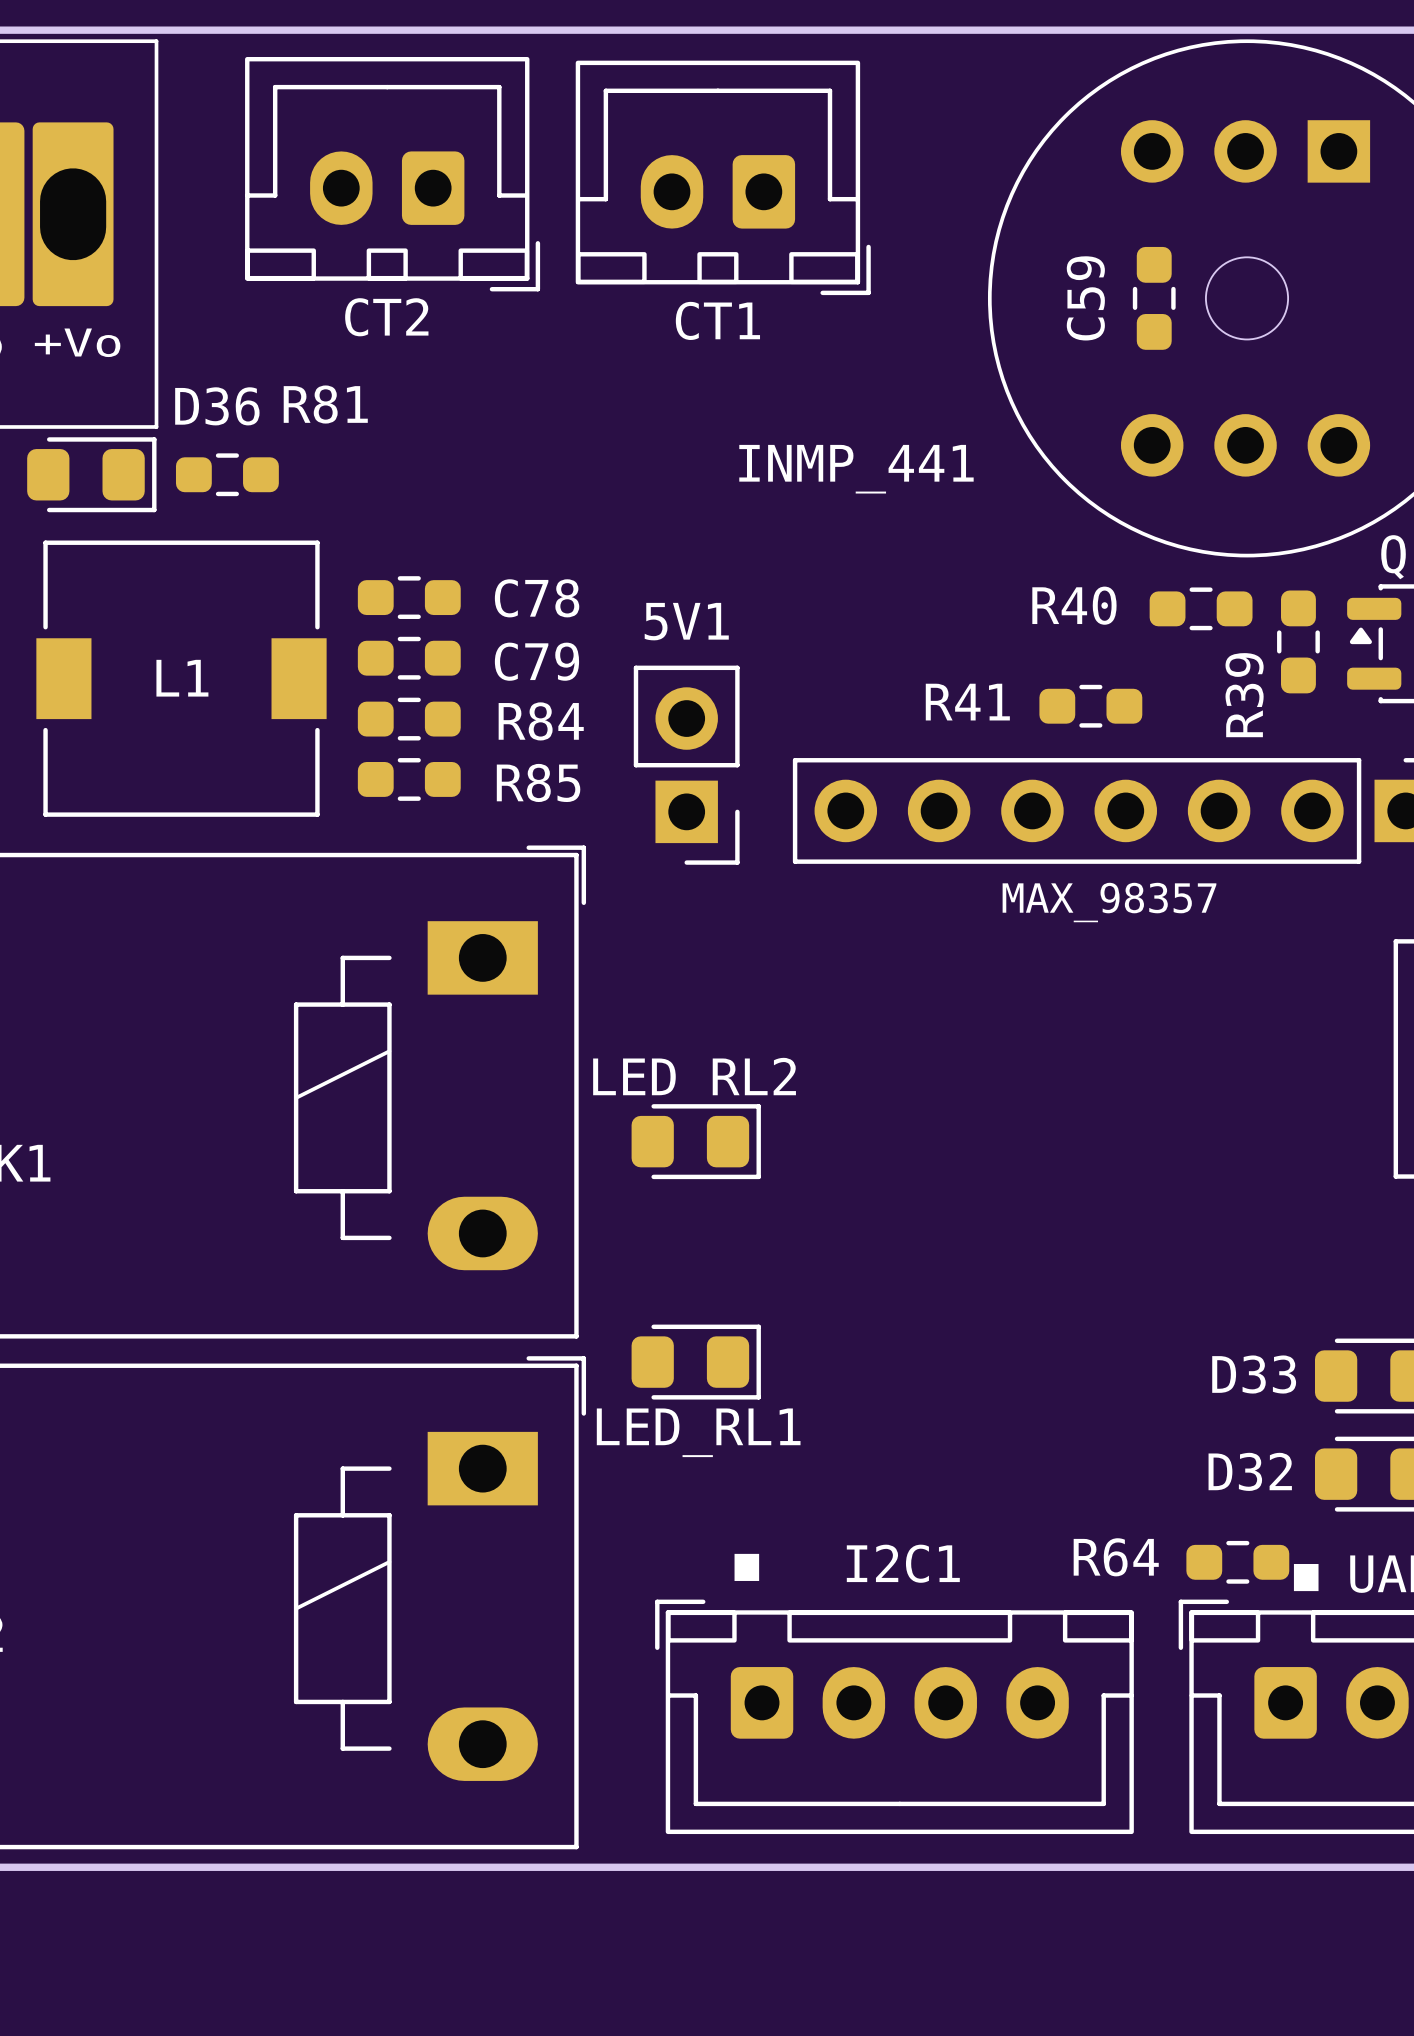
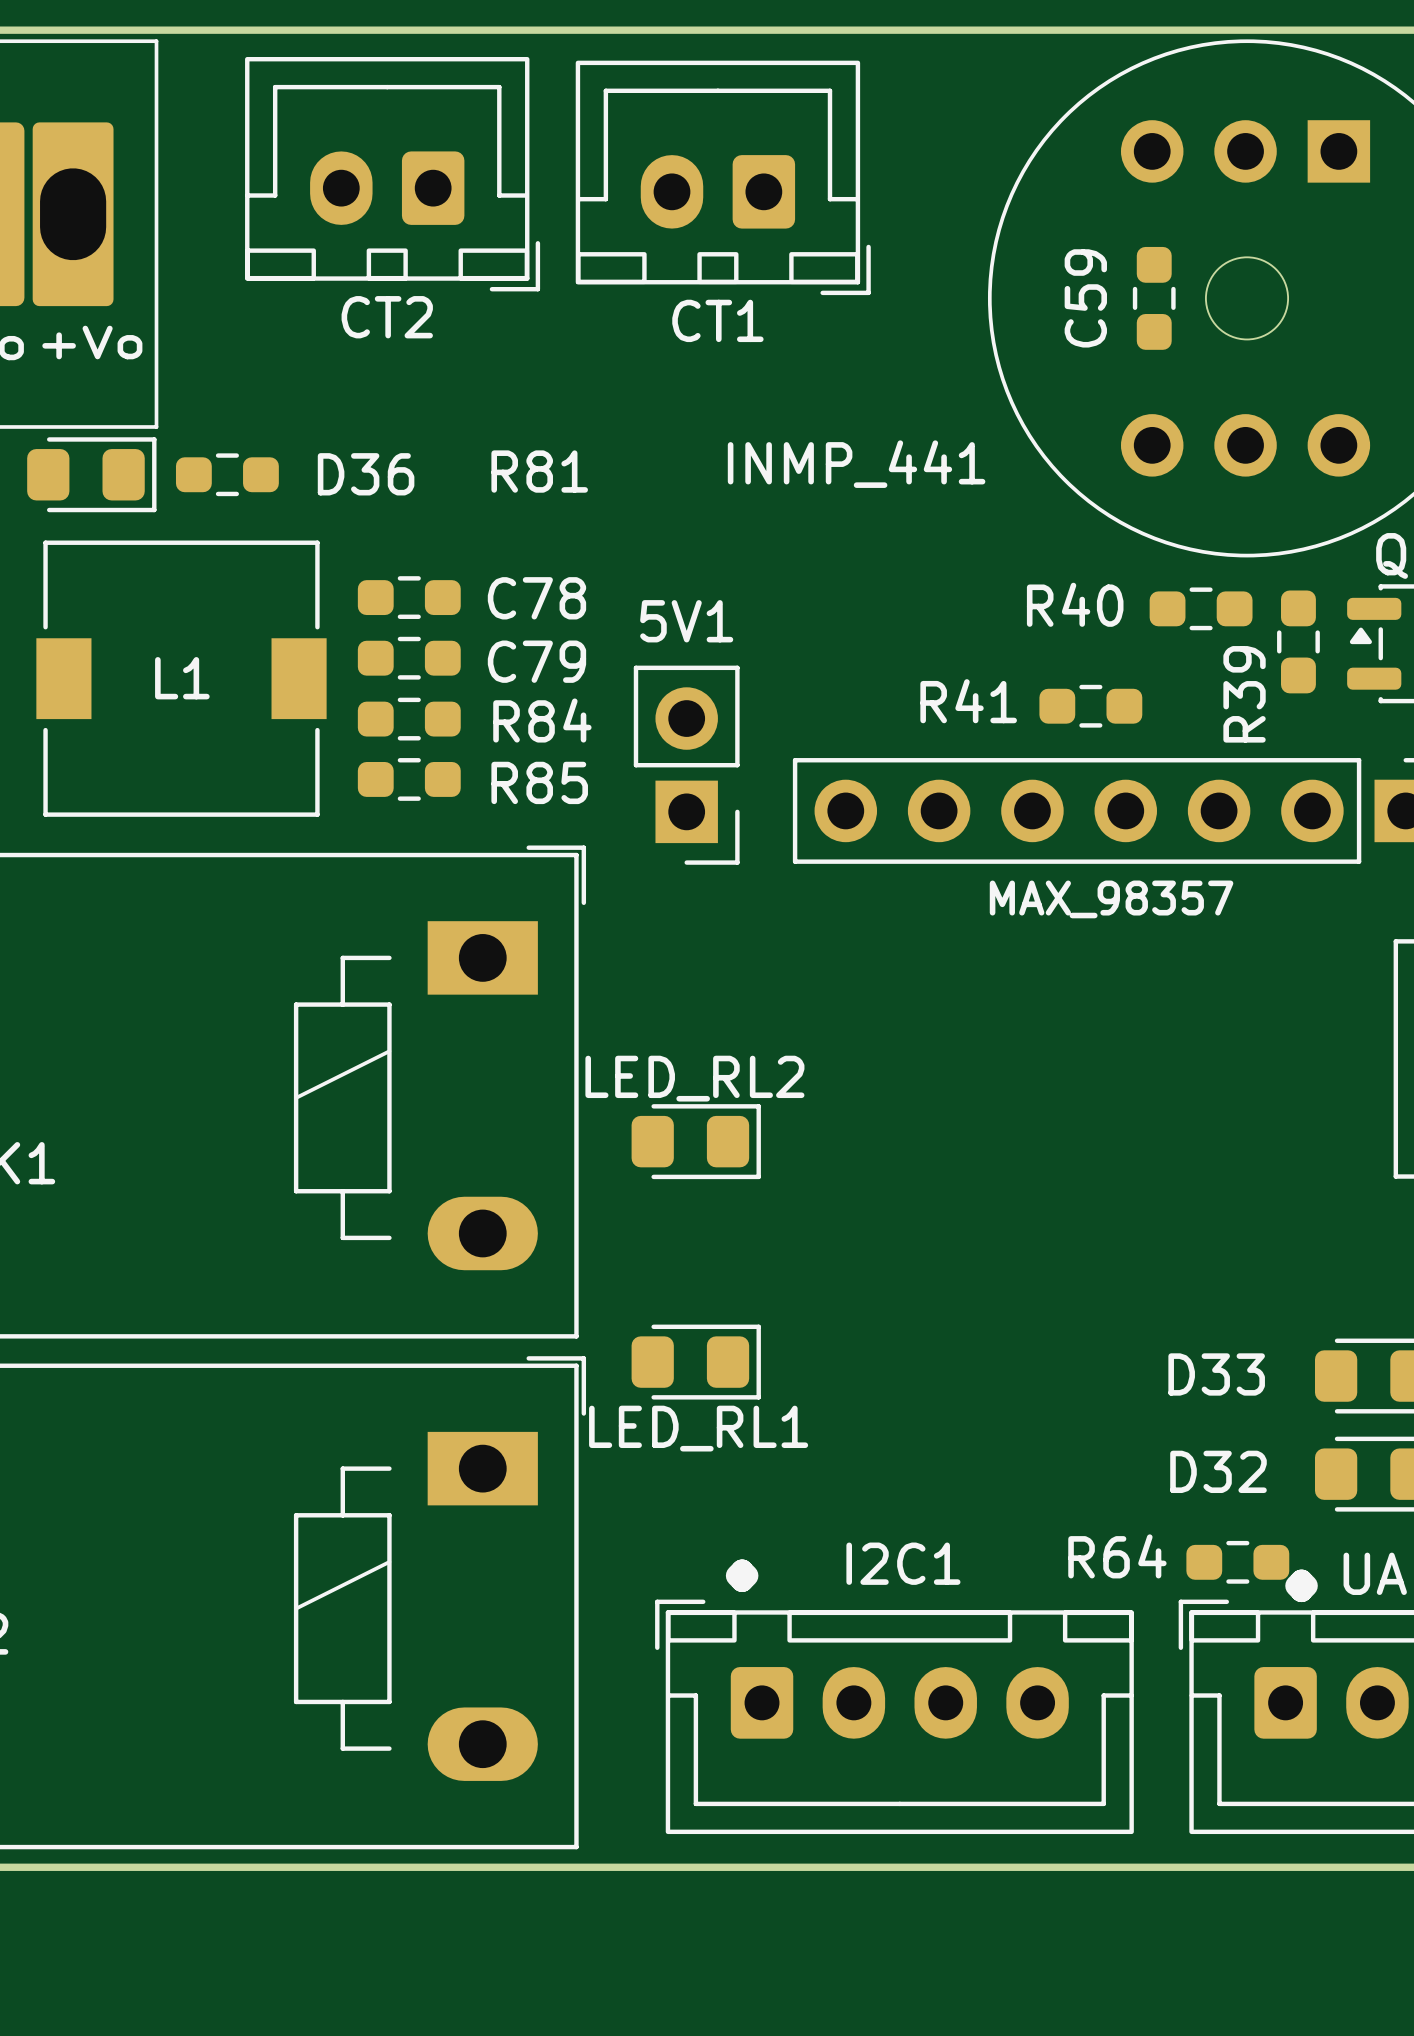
R81 name position: R81 (325, 404) -> R81 (539, 471)
D36 name position: D36 (217, 406) -> D36 (366, 474)
D33 name position: D33 (1254, 1374) -> D33 (1216, 1374)
D32 name position: D32 (1250, 1471) -> D32 (1218, 1471)

